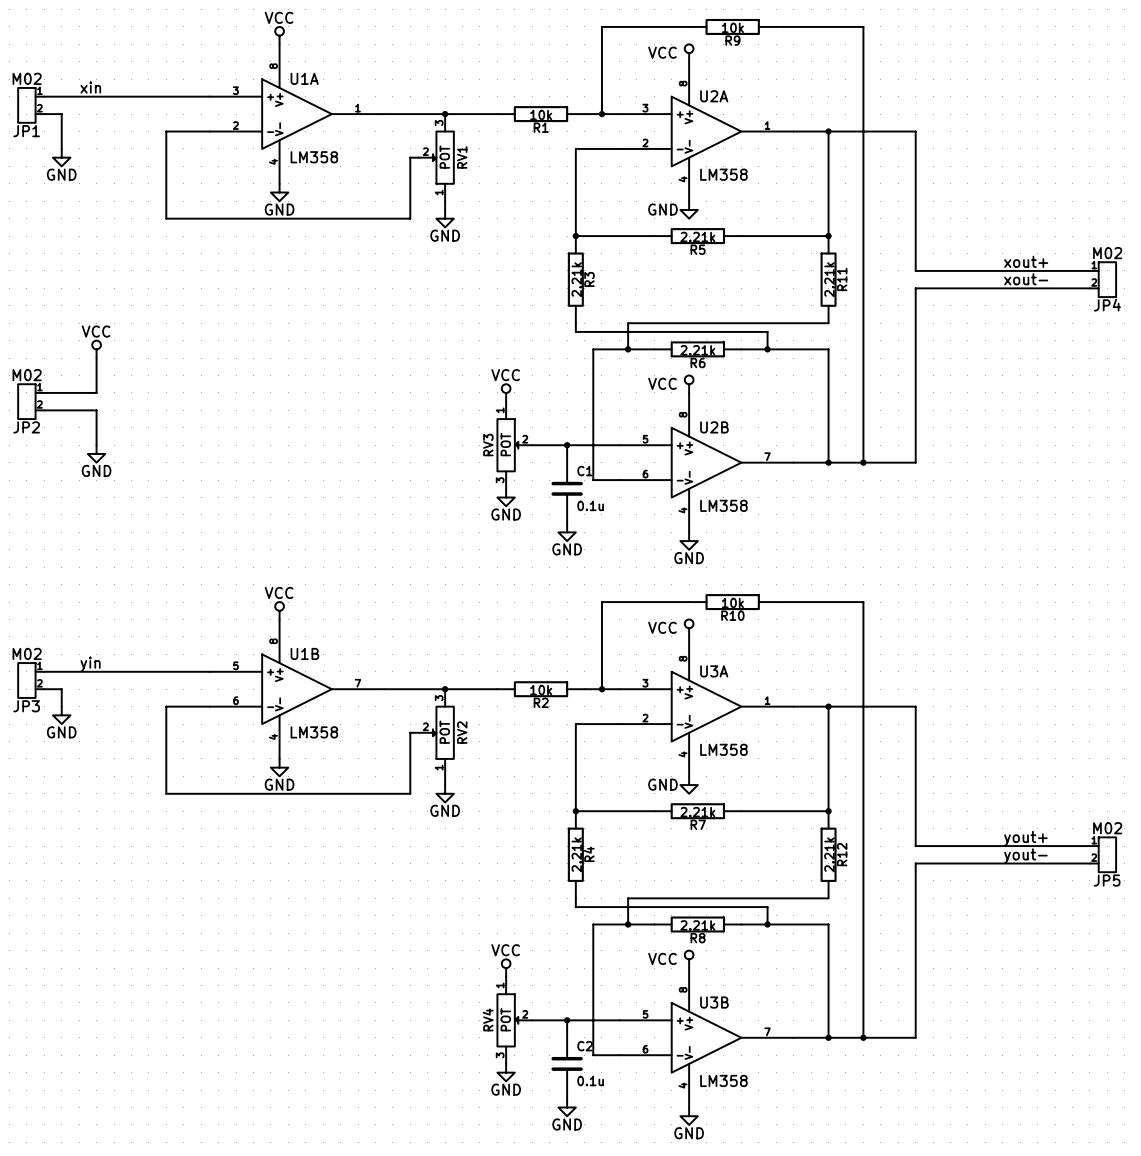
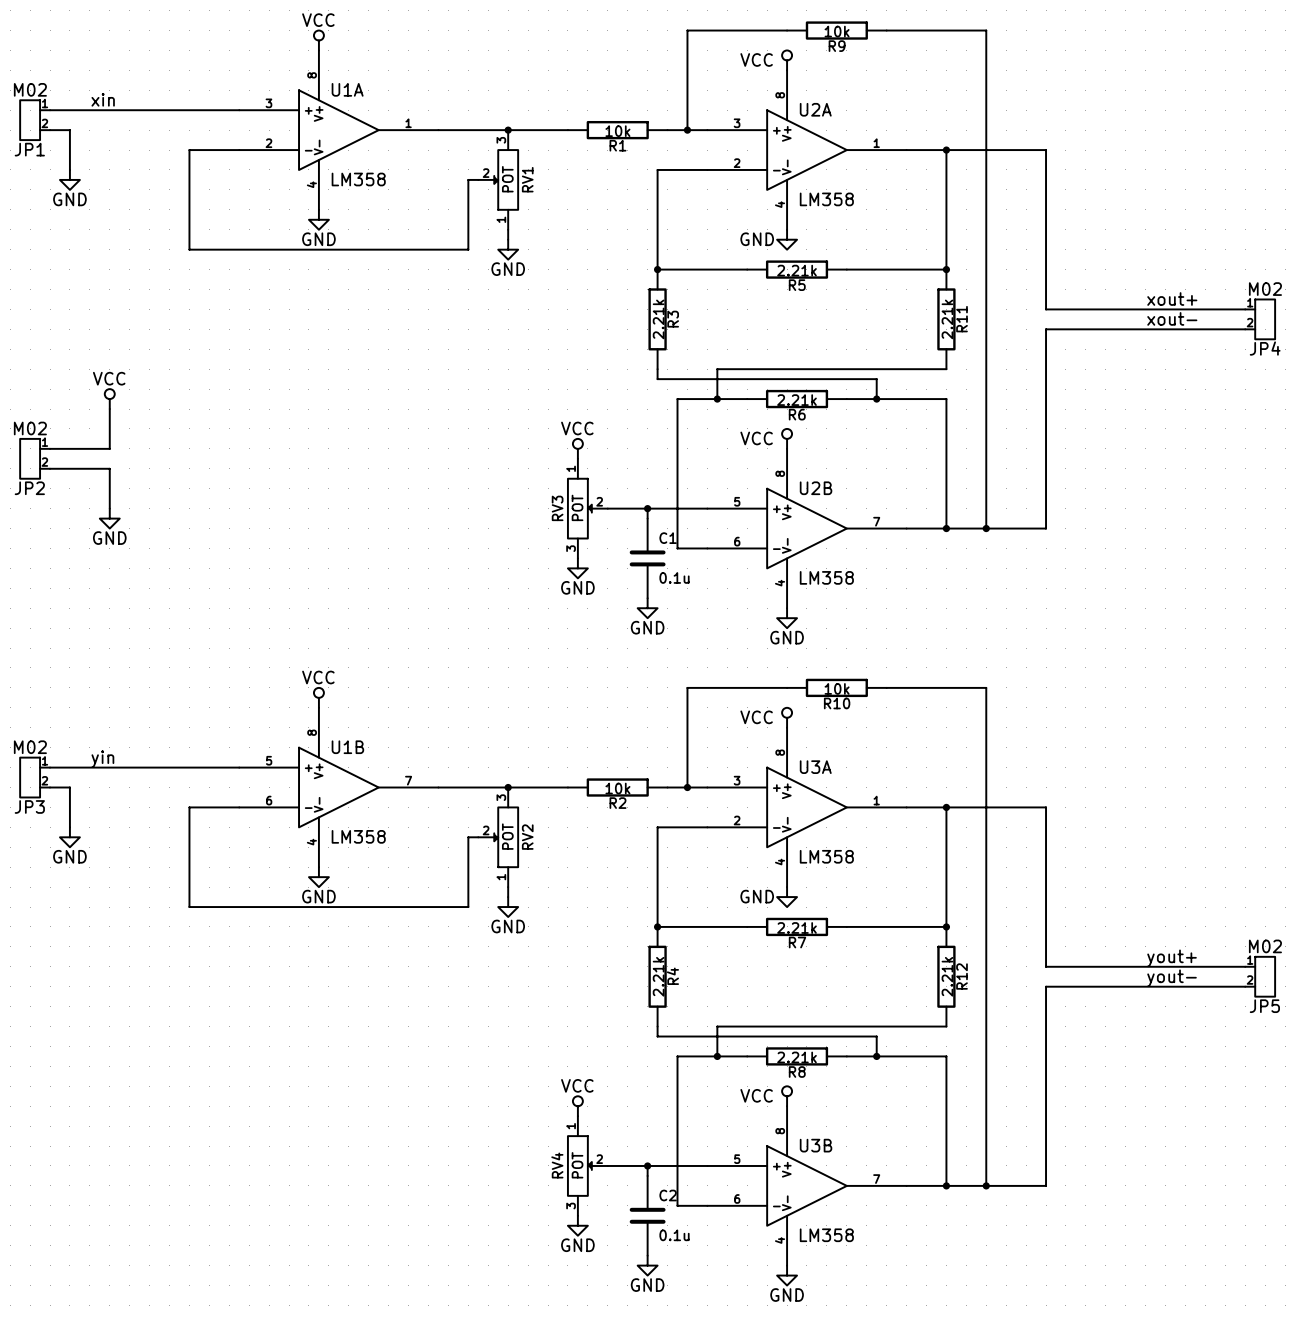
power symbol position: GND (61, 715) -> GND (69, 837)

